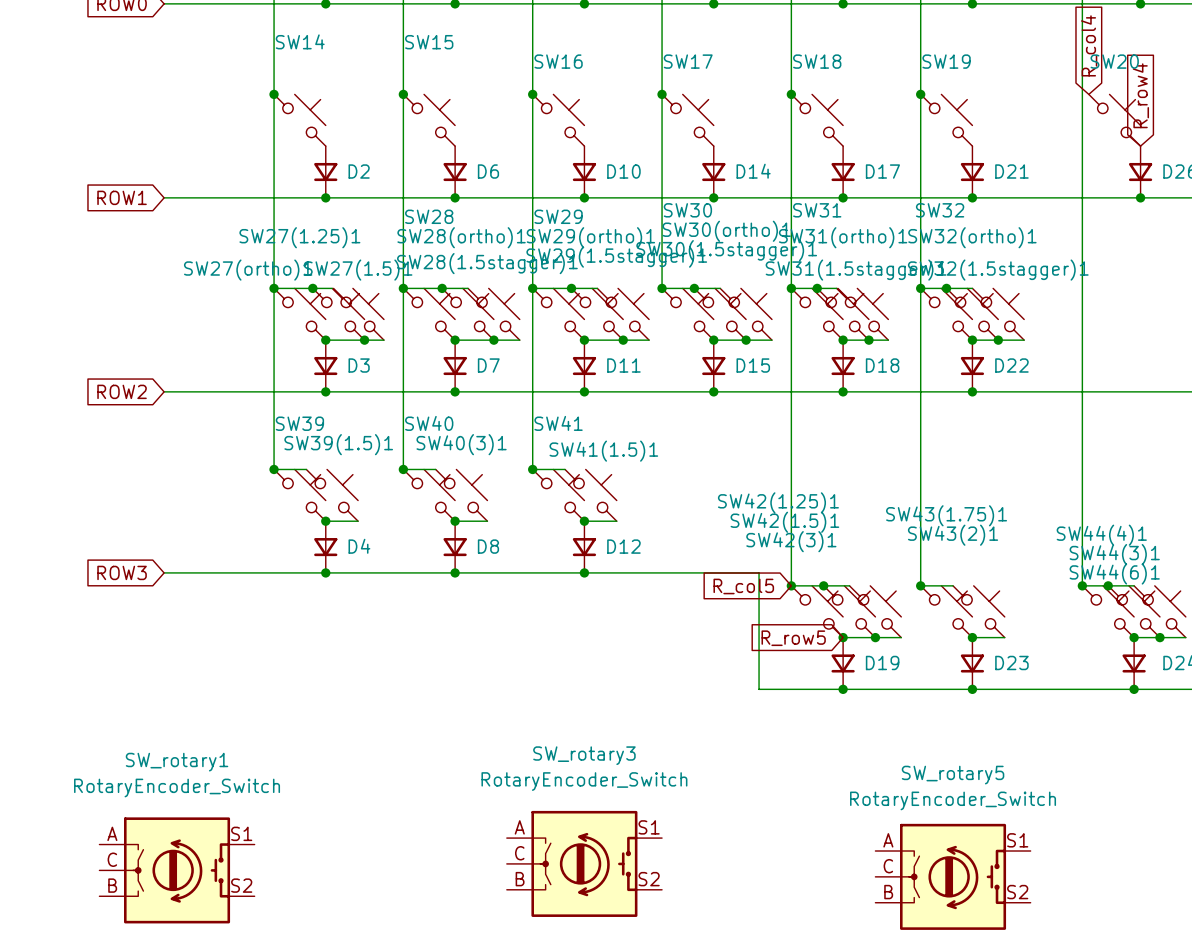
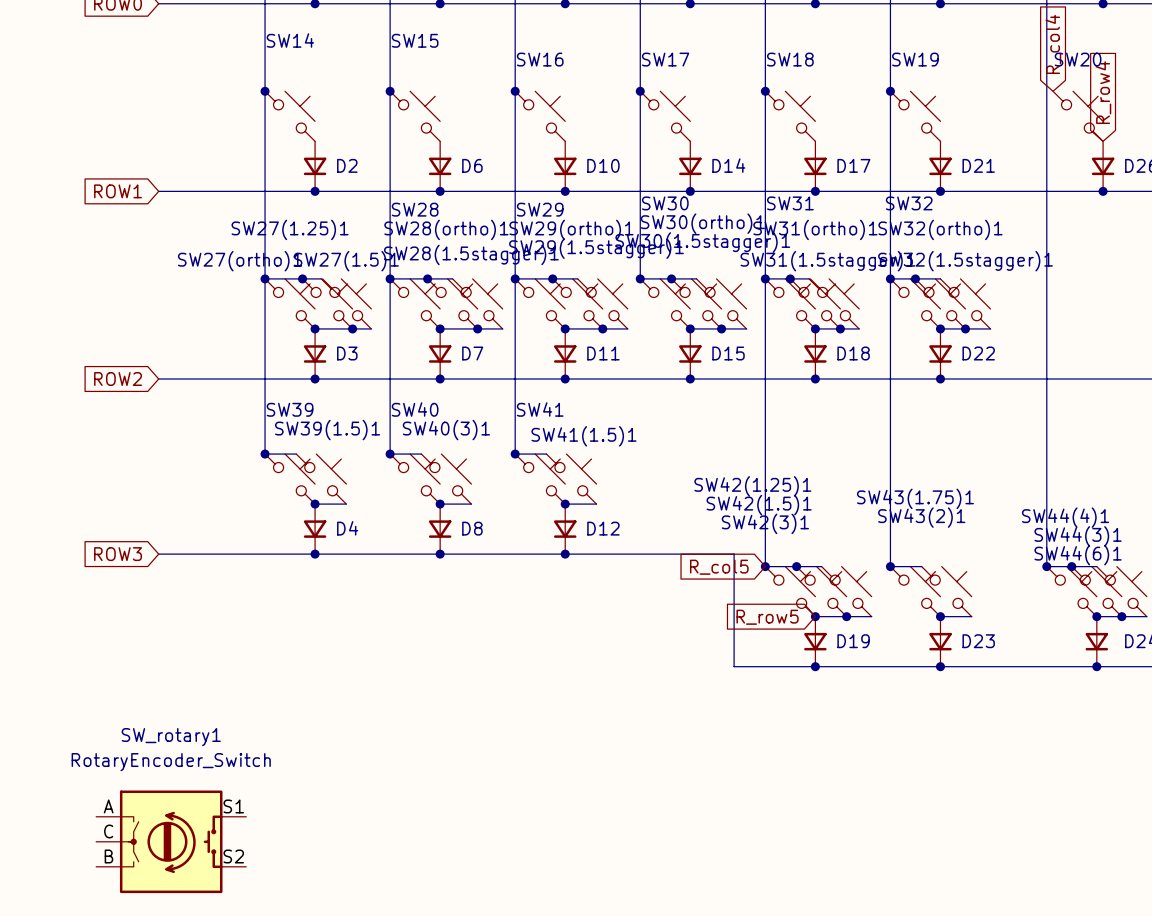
SW_rotary3: RotaryEncoder_Switch (584, 863) -> none
SW_rotary5: RotaryEncoder_Switch (953, 876) -> none

